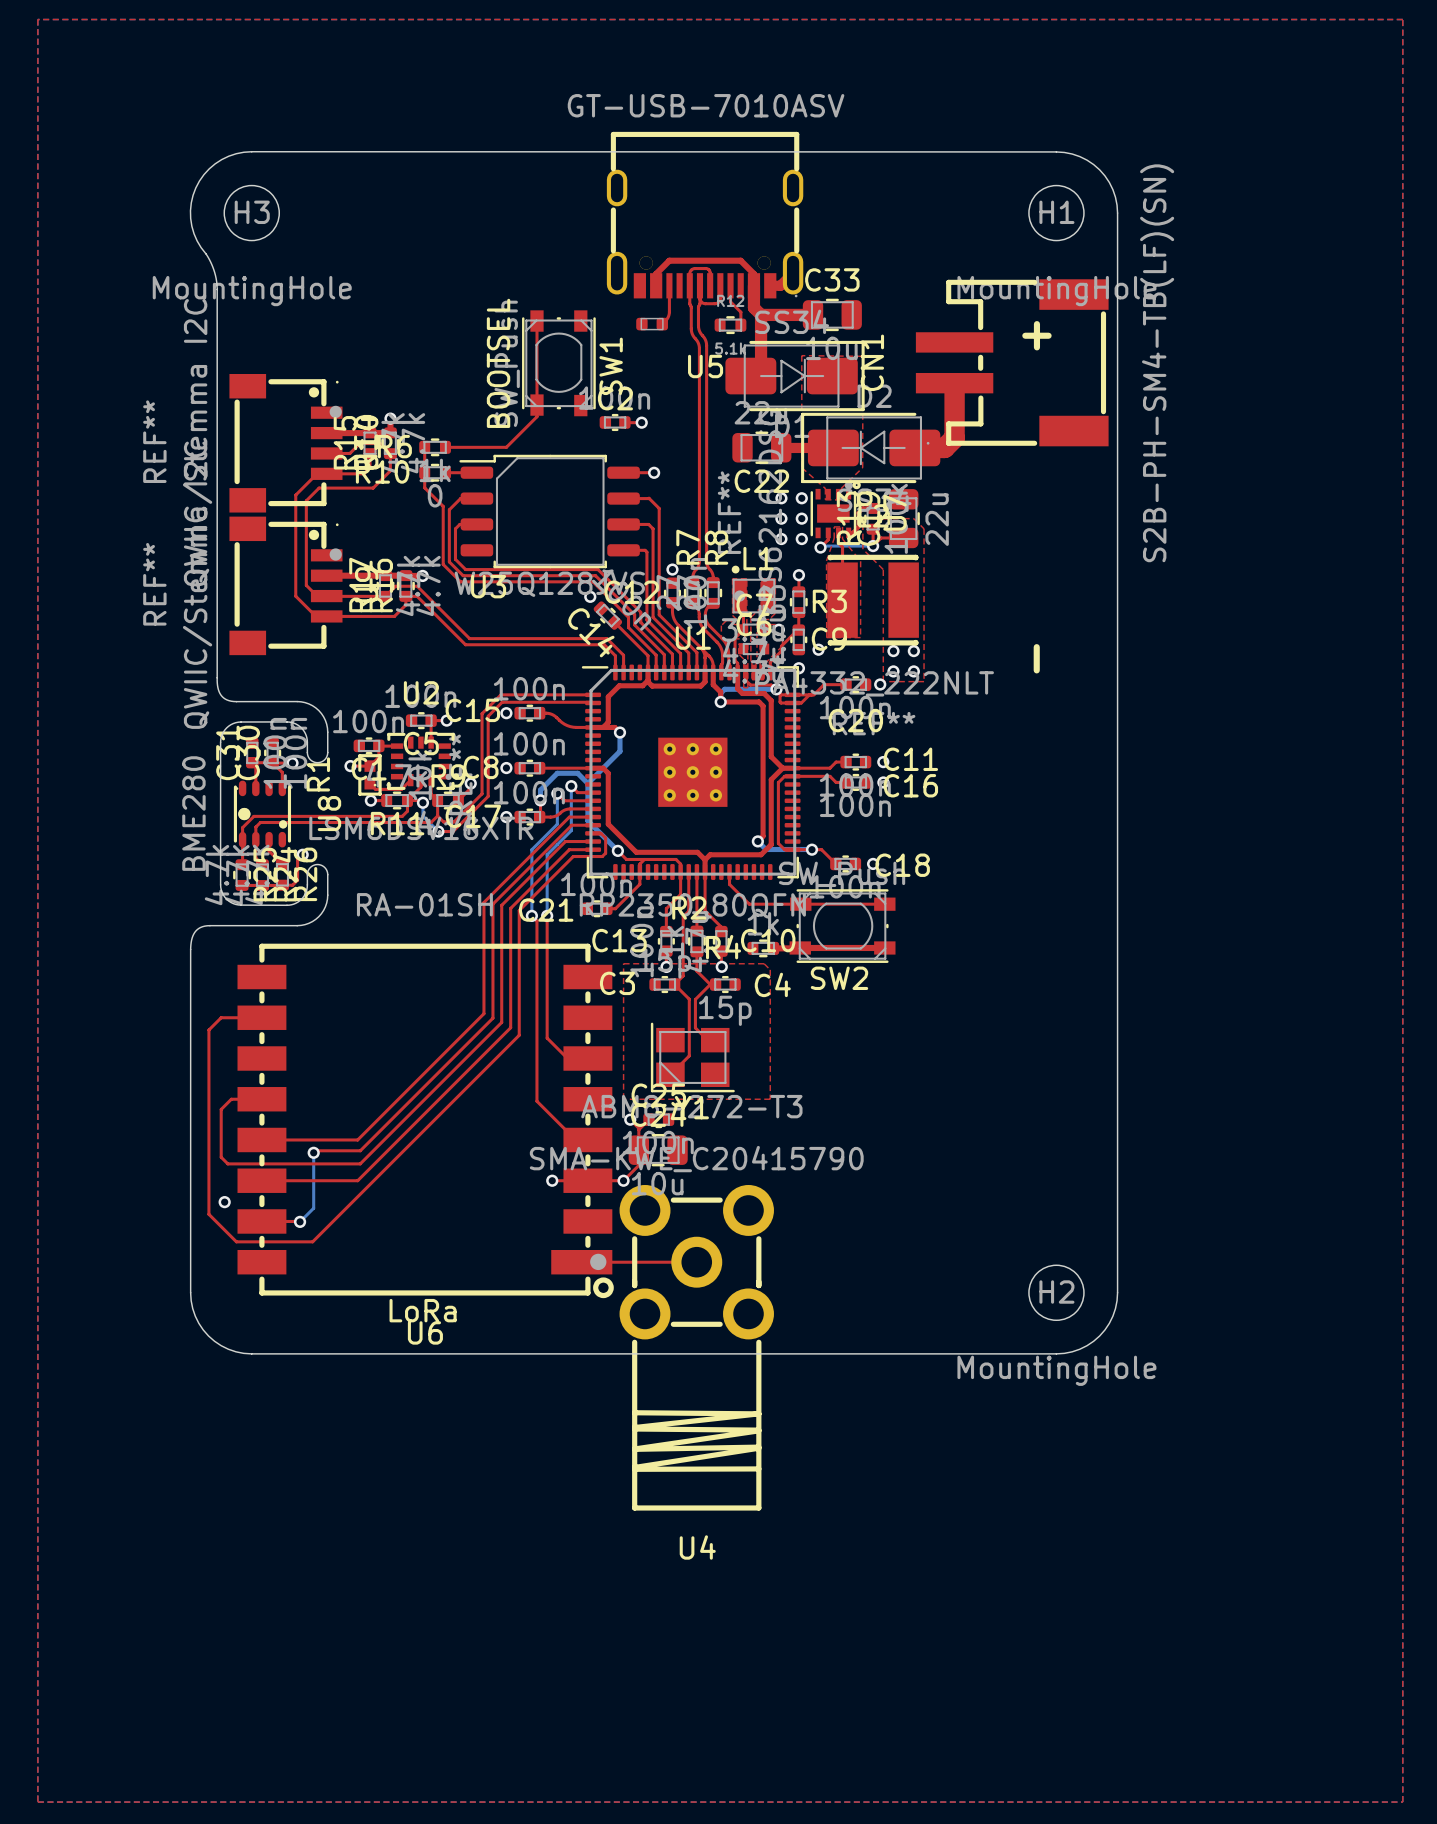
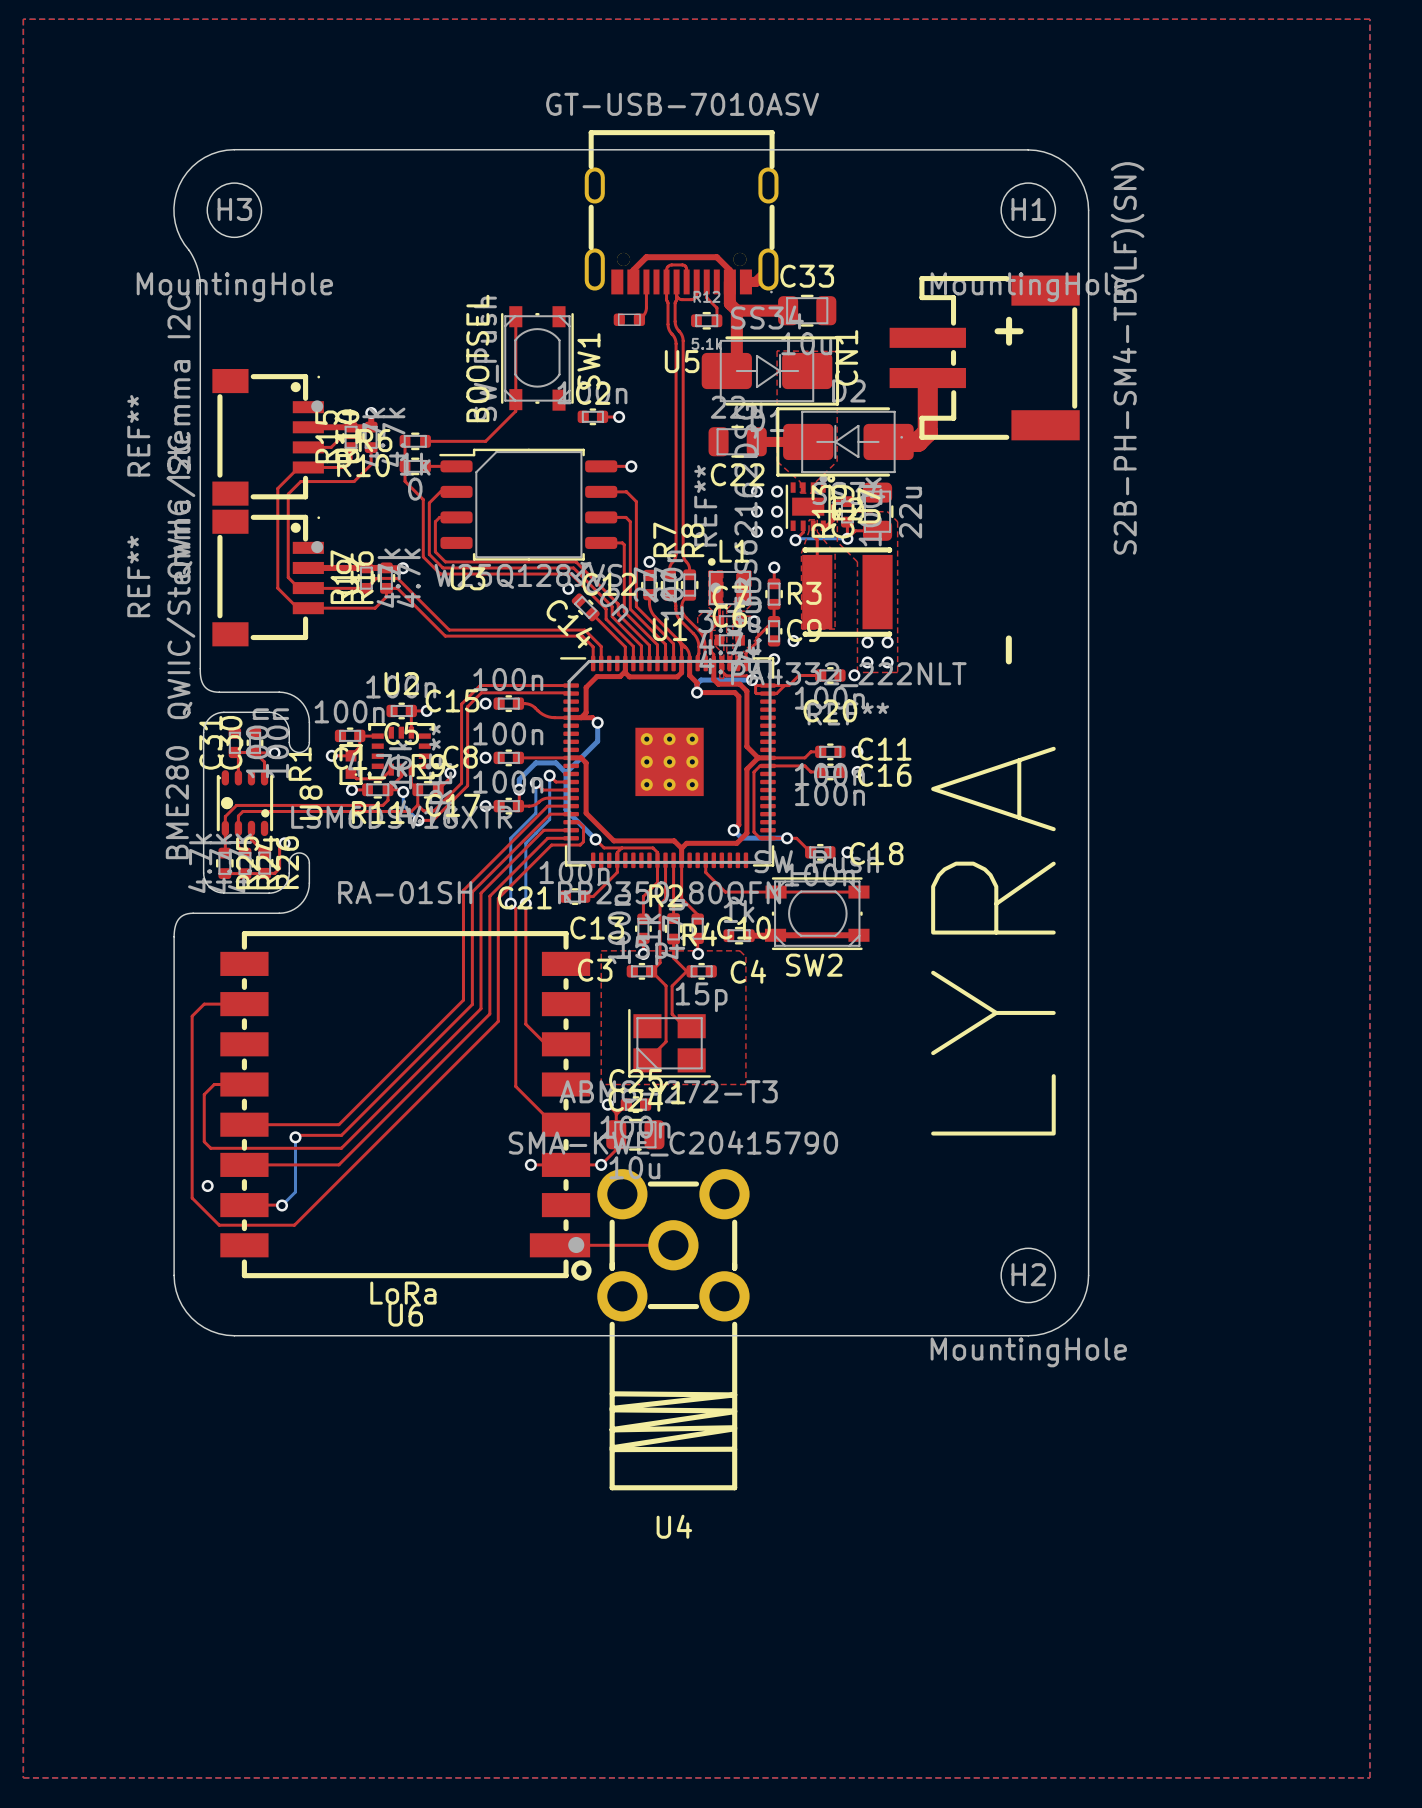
text: none -> LYRA (993, 941)

